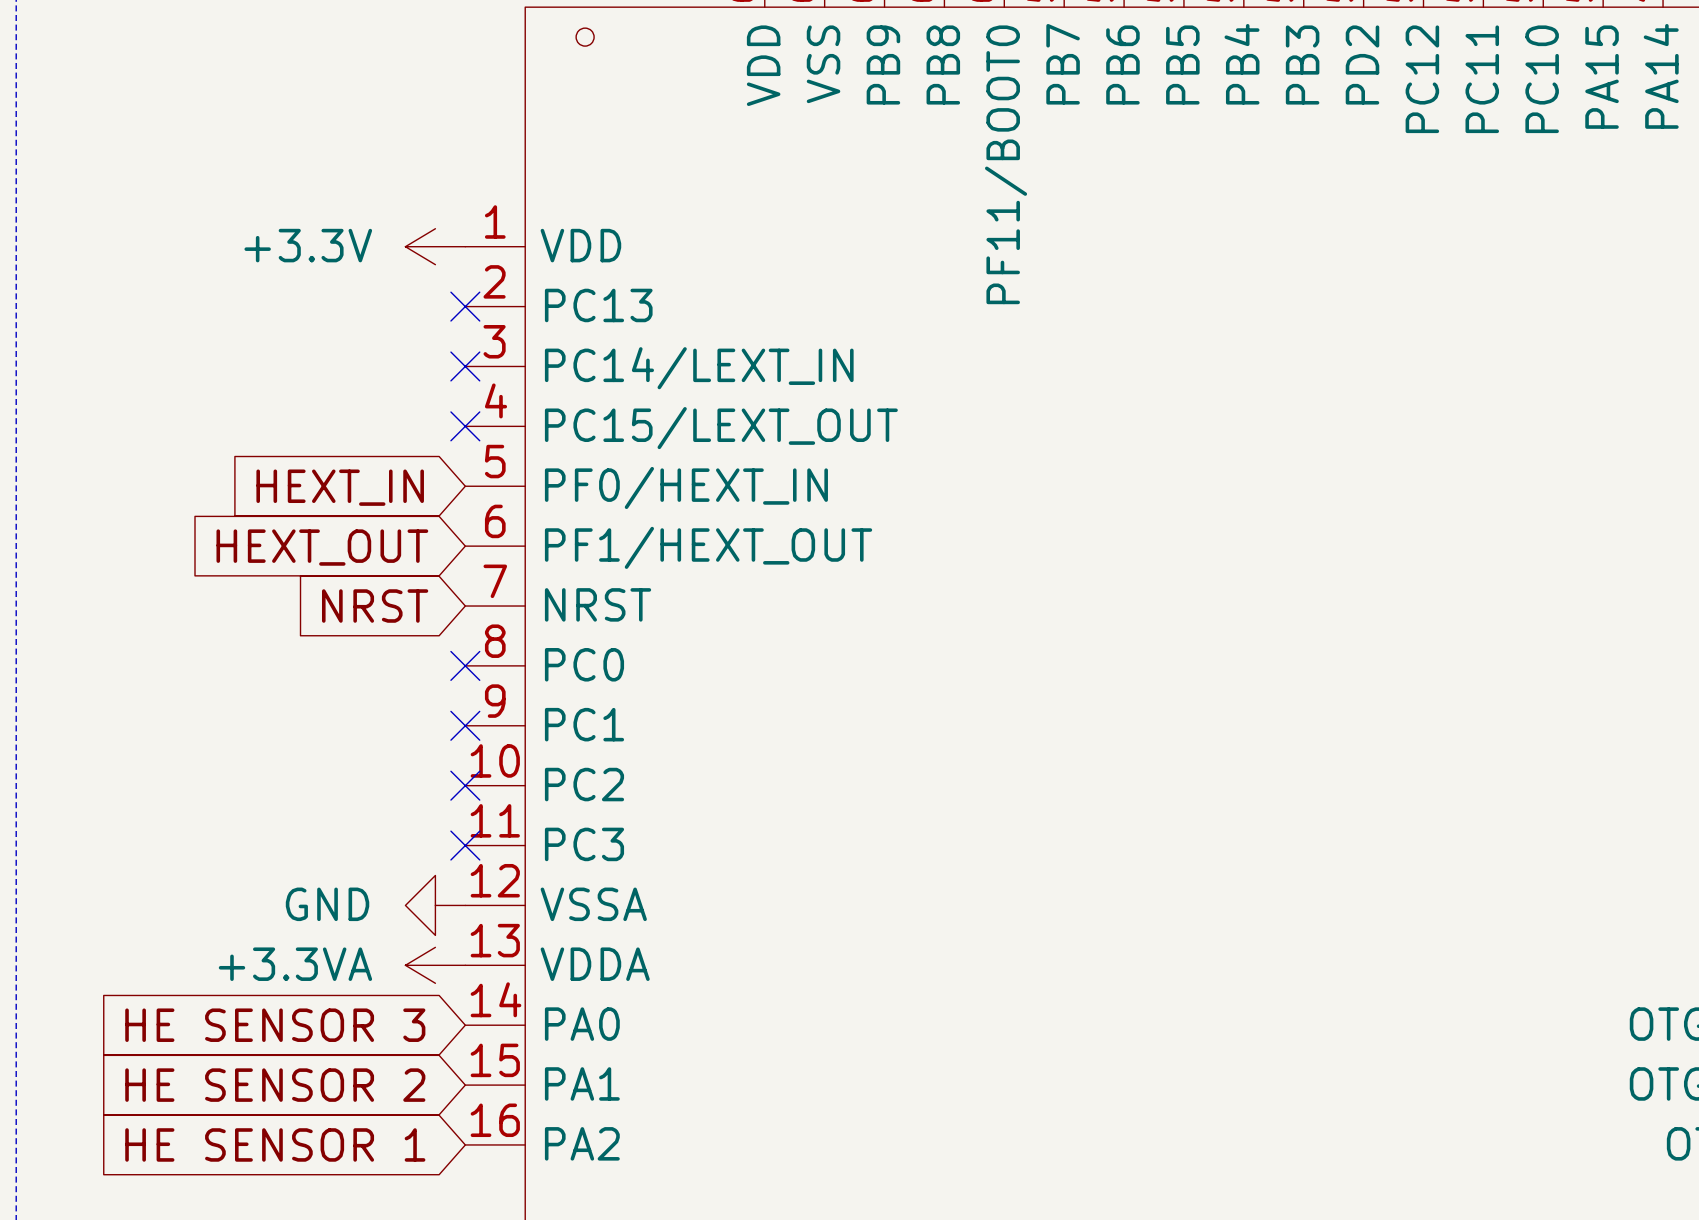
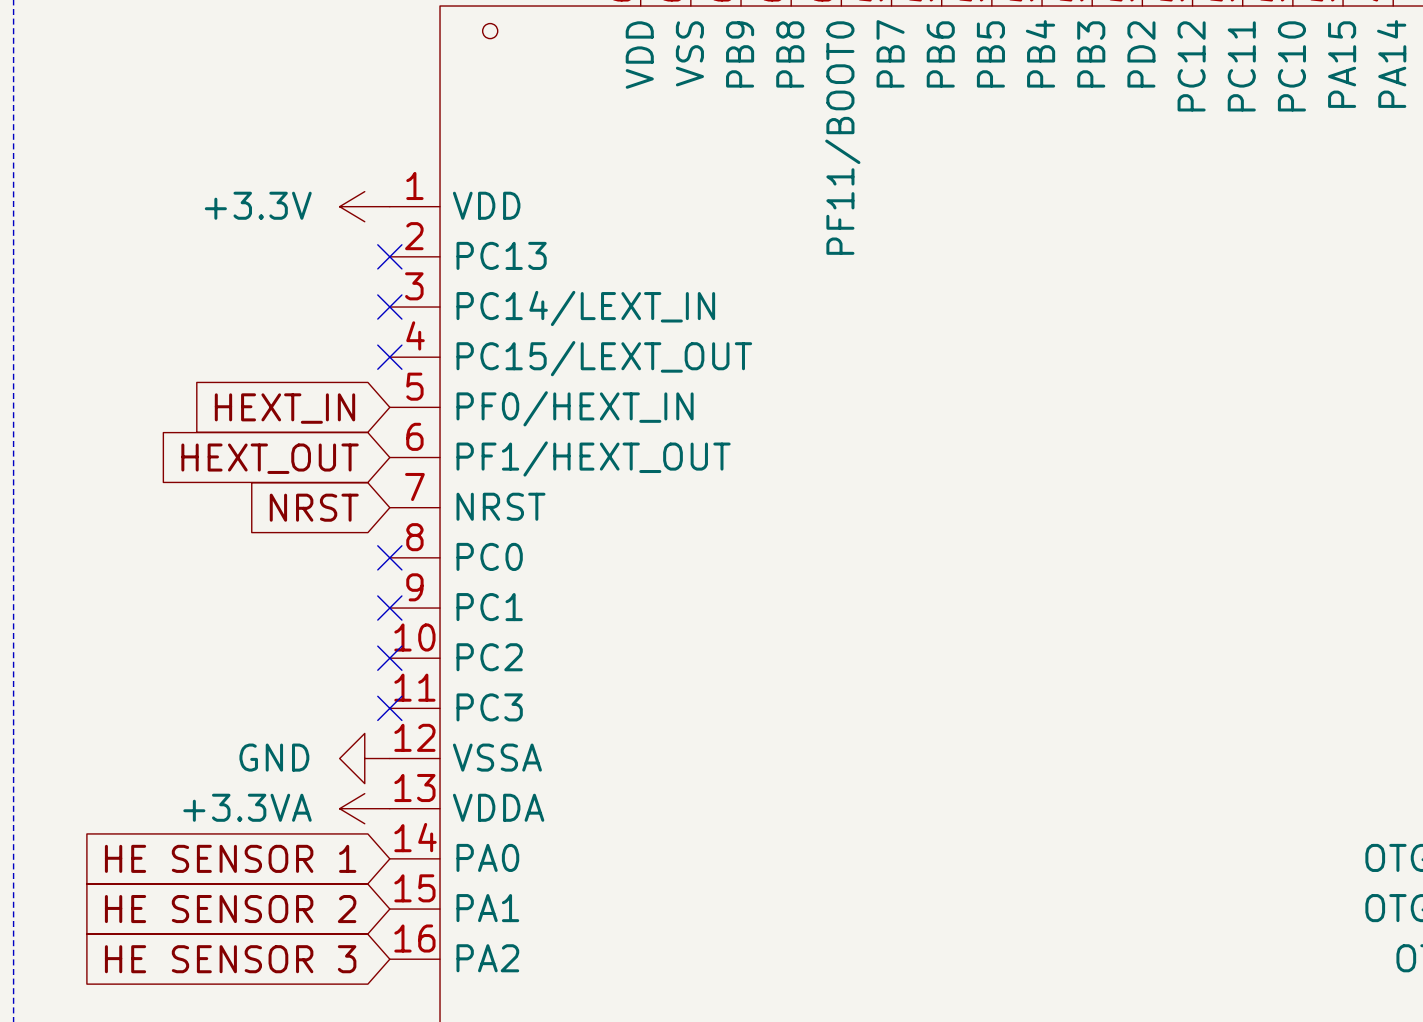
global label: HE SENSOR 3 (275, 1025) -> HE SENSOR 1 (230, 858)
global label: HE SENSOR 1 (275, 1144) -> HE SENSOR 3 (230, 959)

